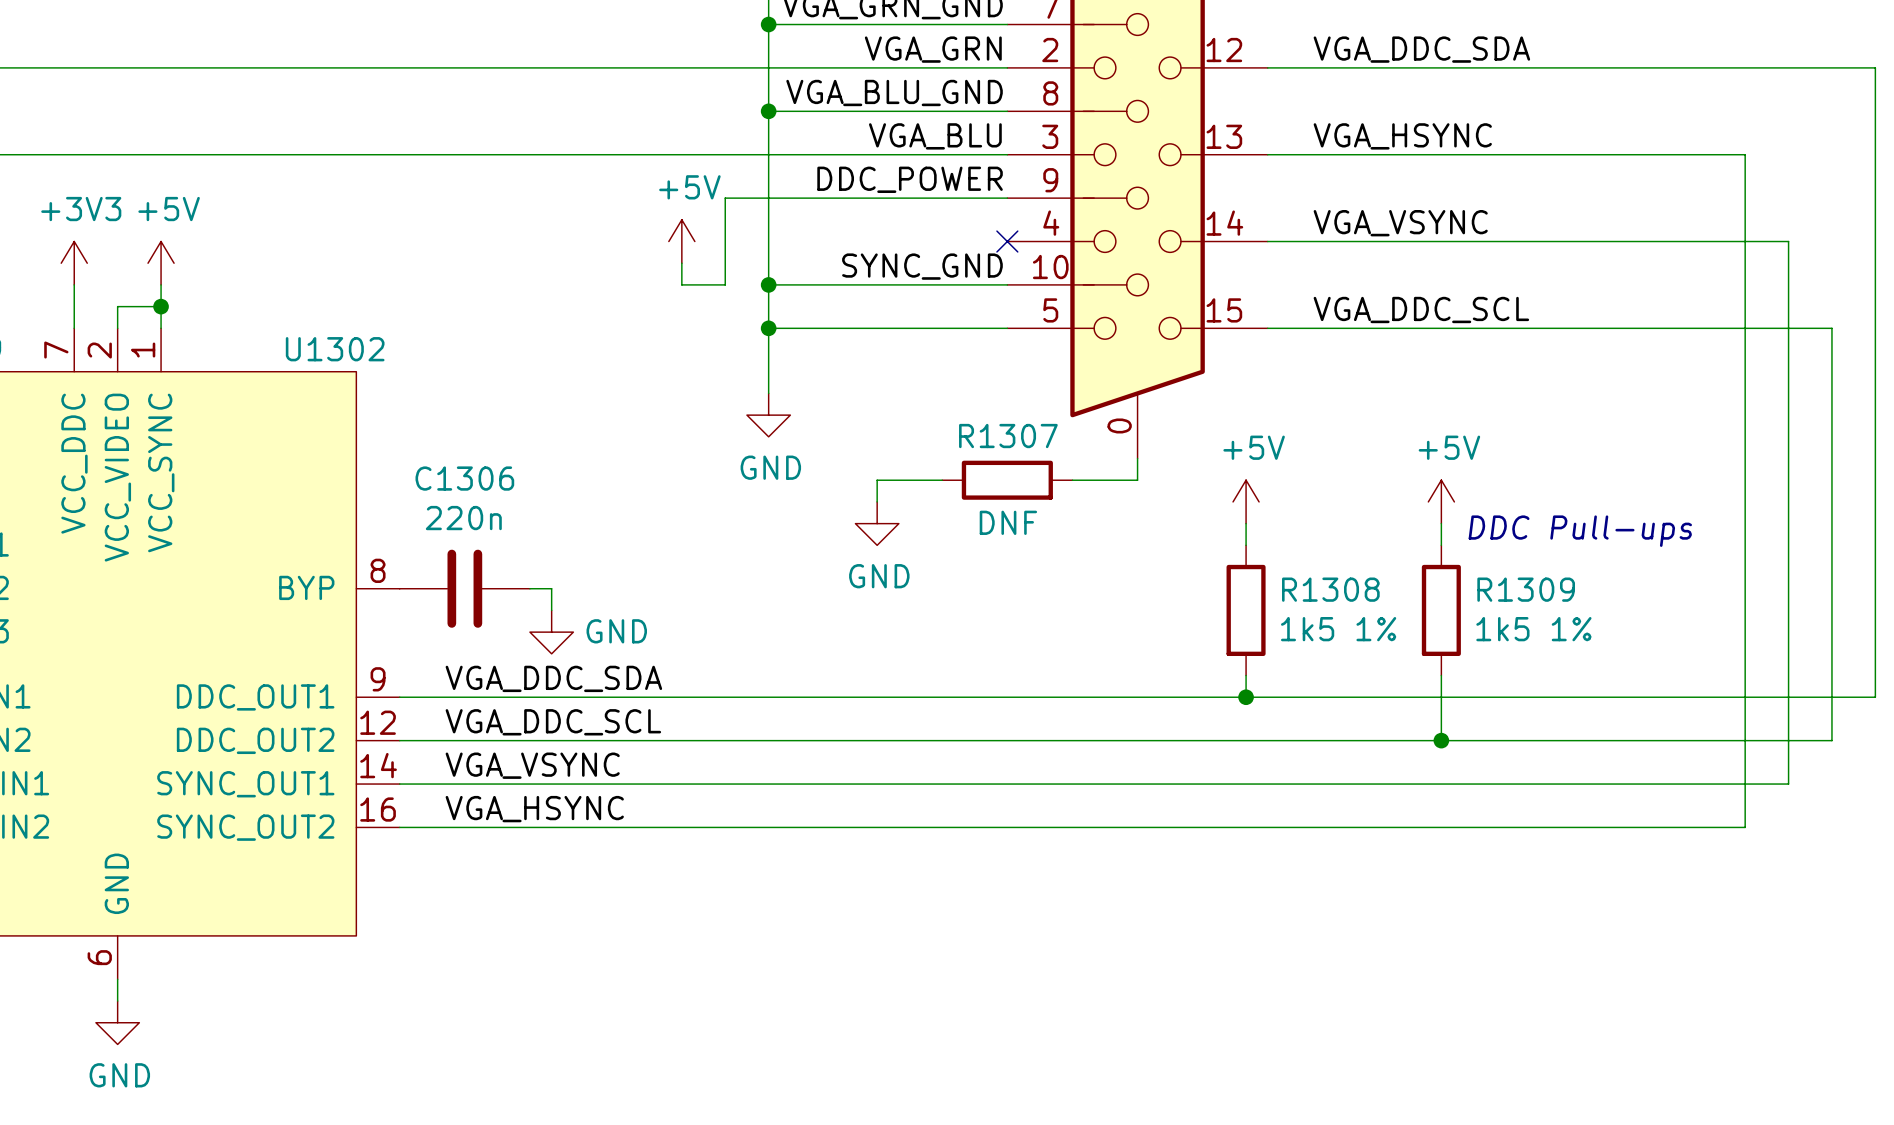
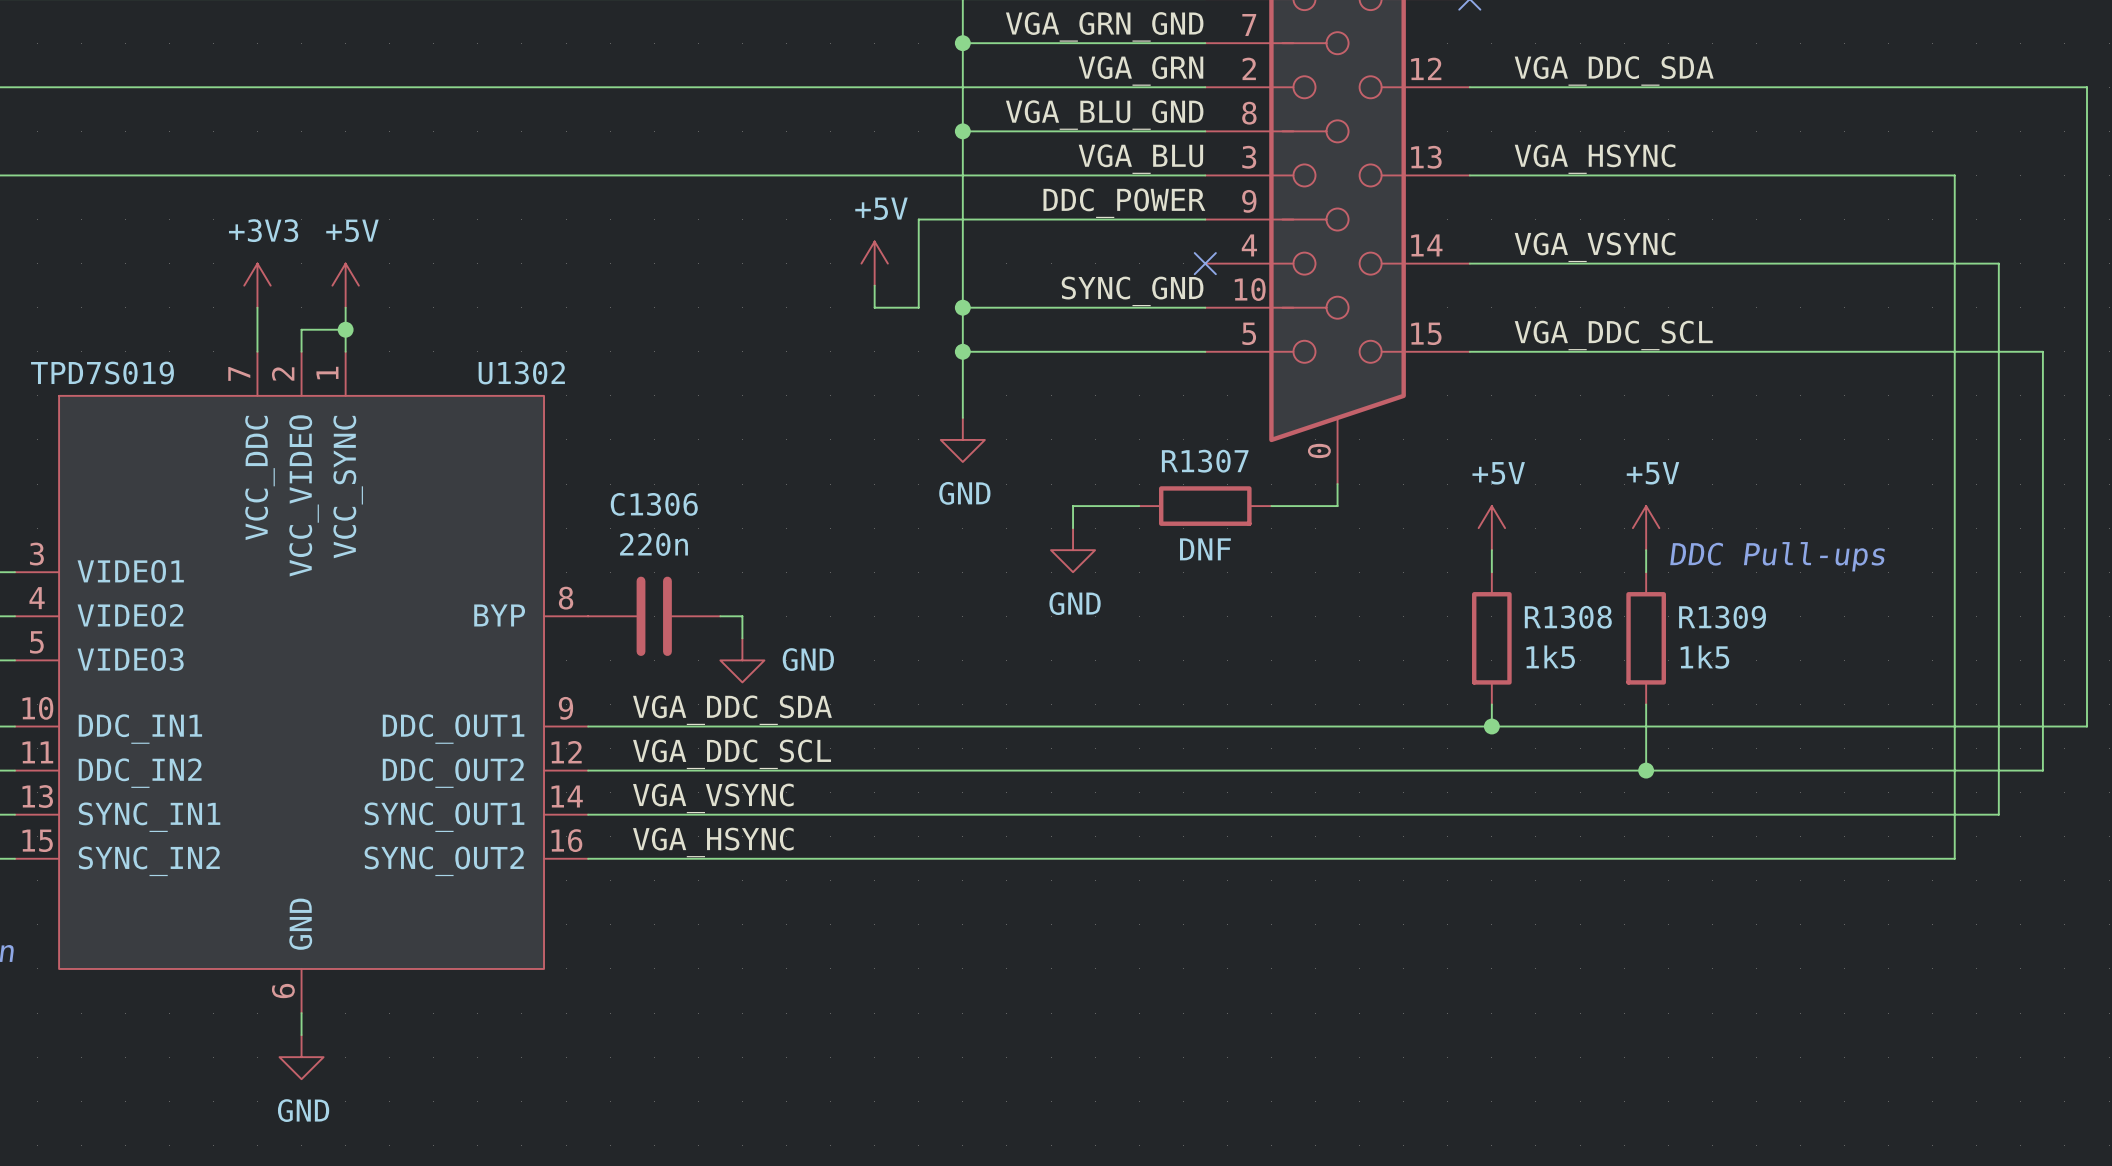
power symbol position: +5V (1246, 501) -> +5V (1491, 528)
wire: (1246, 523) (1246, 545) -> (1491, 550) (1491, 572)
R1308 position: (1246, 610) -> (1491, 638)
R1308 value: 1k5 1% (1338, 629) -> 1k5 (1550, 657)
R1309 value: 1k5 1% (1533, 629) -> 1k5 (1704, 657)
wire: (1246, 675) (1246, 697) -> (1491, 704) (1491, 726)
junction position: (1246, 697) -> (1491, 726)

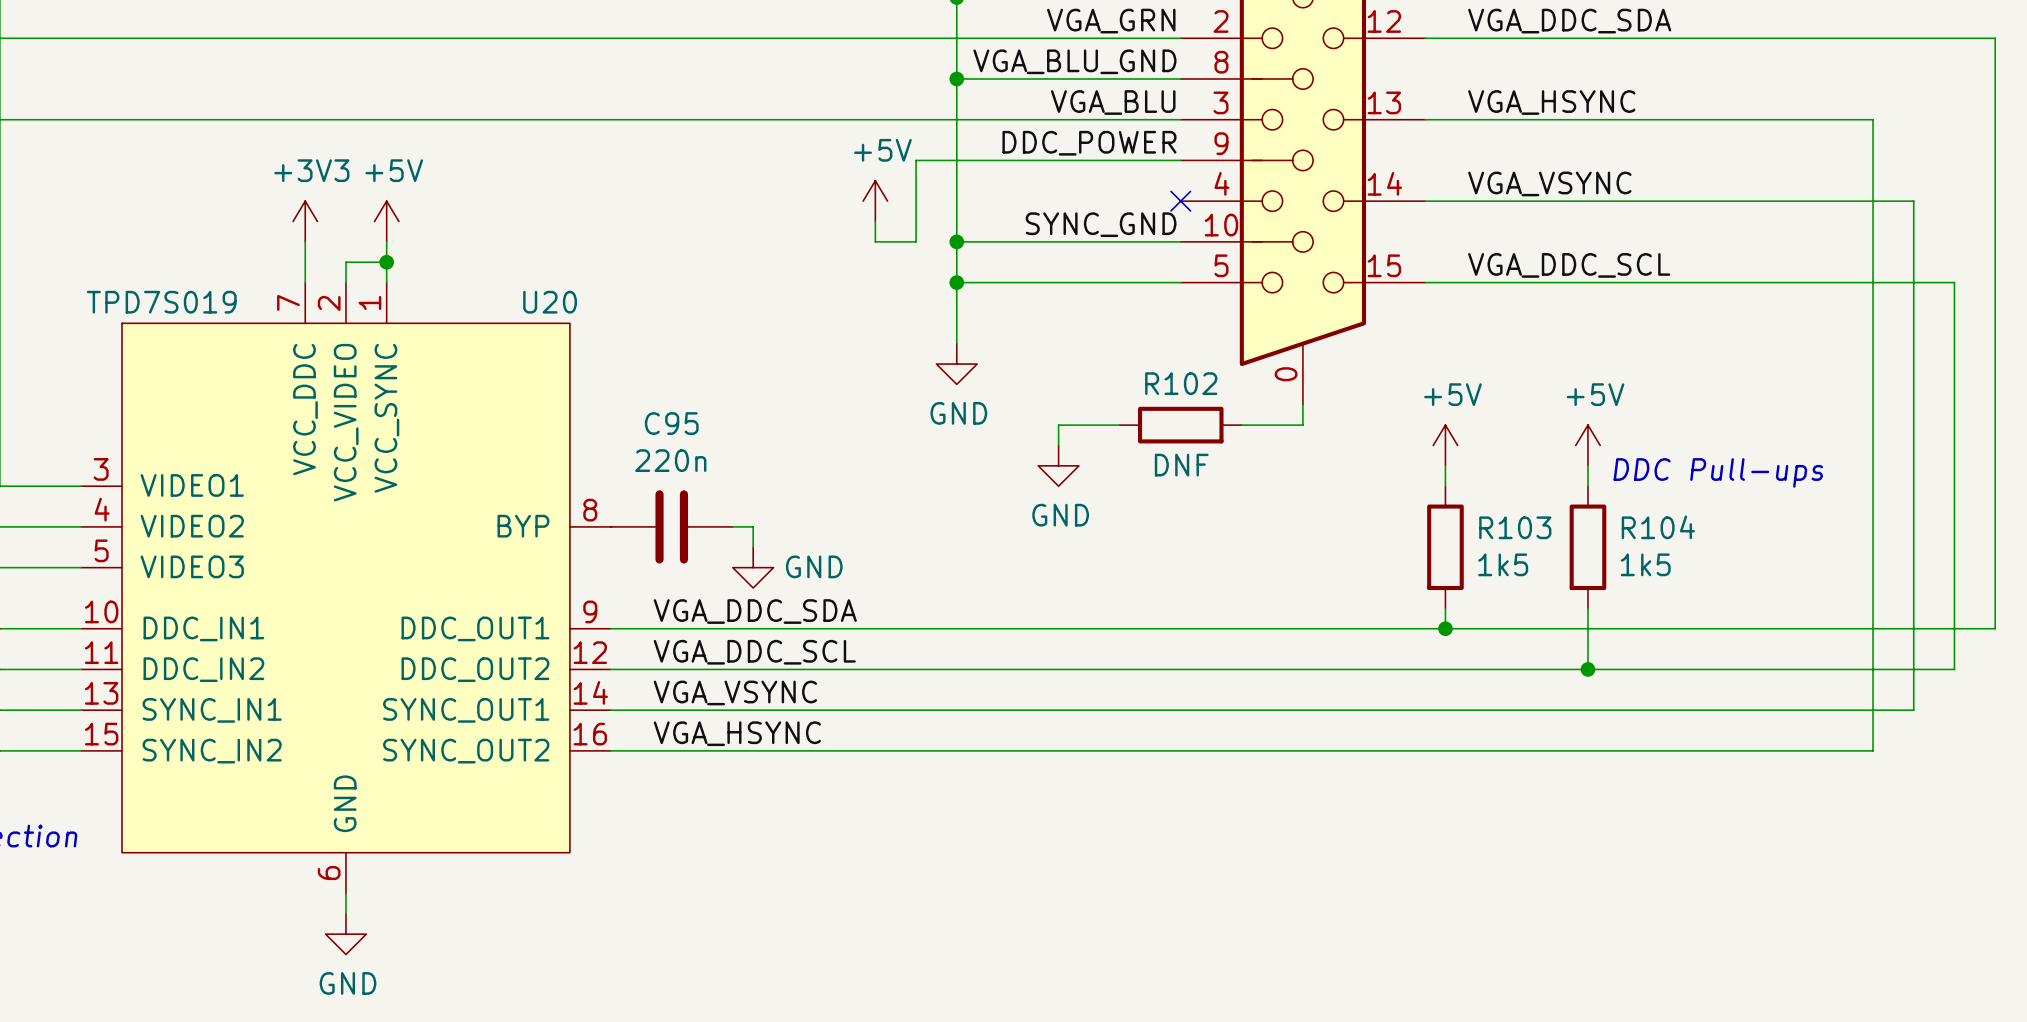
U1302 name: U1302 (521, 373) -> U20 (550, 302)
R1307 name: R1307 (1205, 461) -> R102 (1181, 383)
C1306 name: C1306 (654, 504) -> C95 (671, 423)
R1308 name: R1308 (1568, 617) -> R103 (1515, 527)
R1309 name: R1309 (1722, 617) -> R104 (1658, 527)

